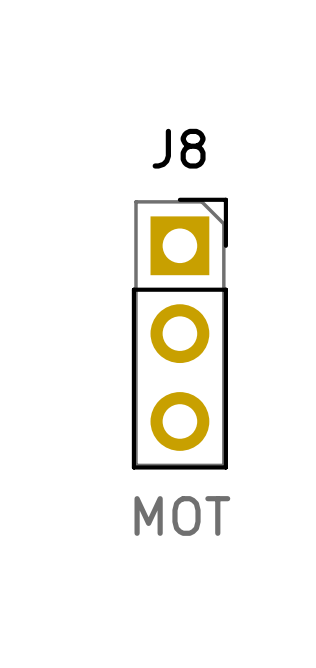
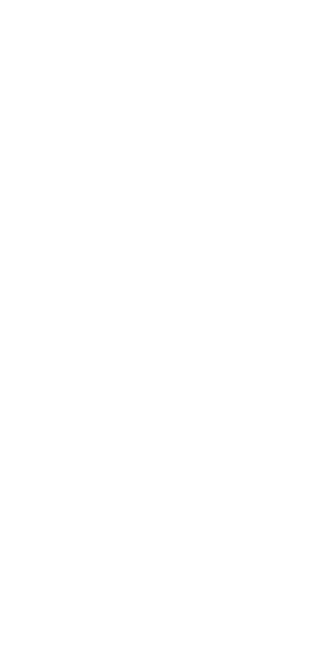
J8: MOT (179, 333) -> none

